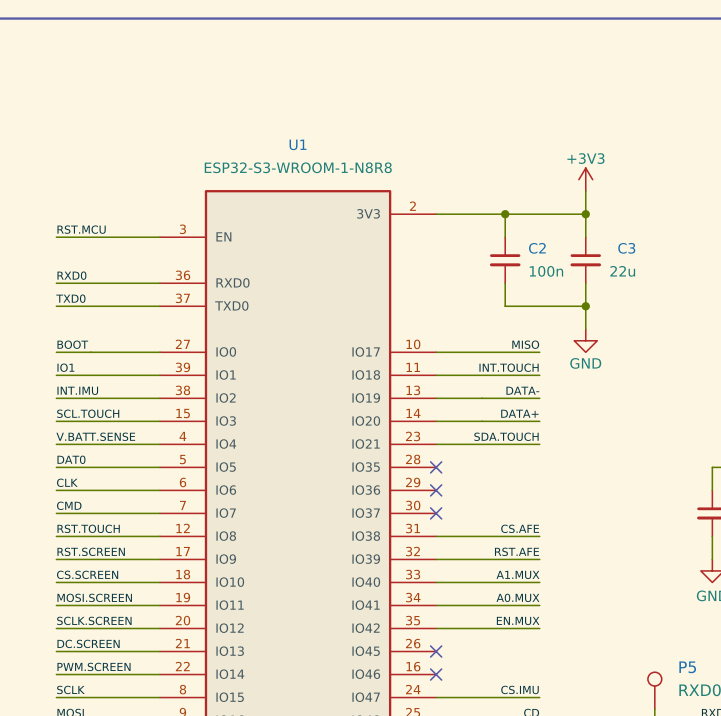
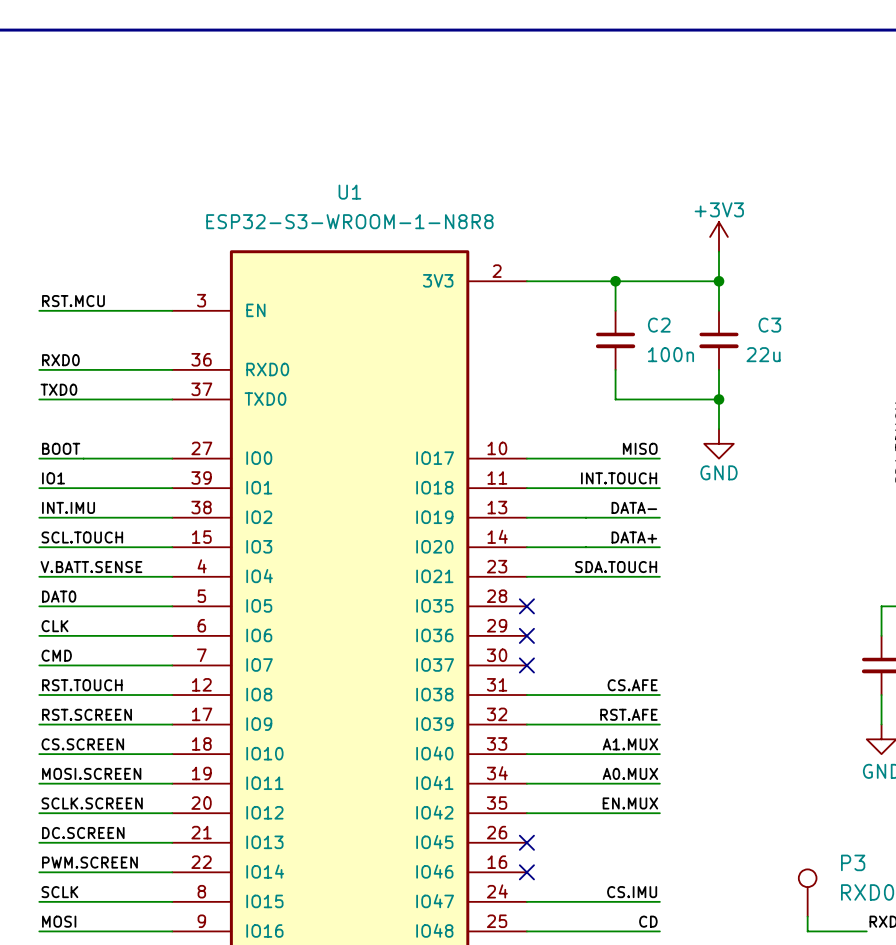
P5 name: P5 (687, 667) -> P3 (853, 862)

